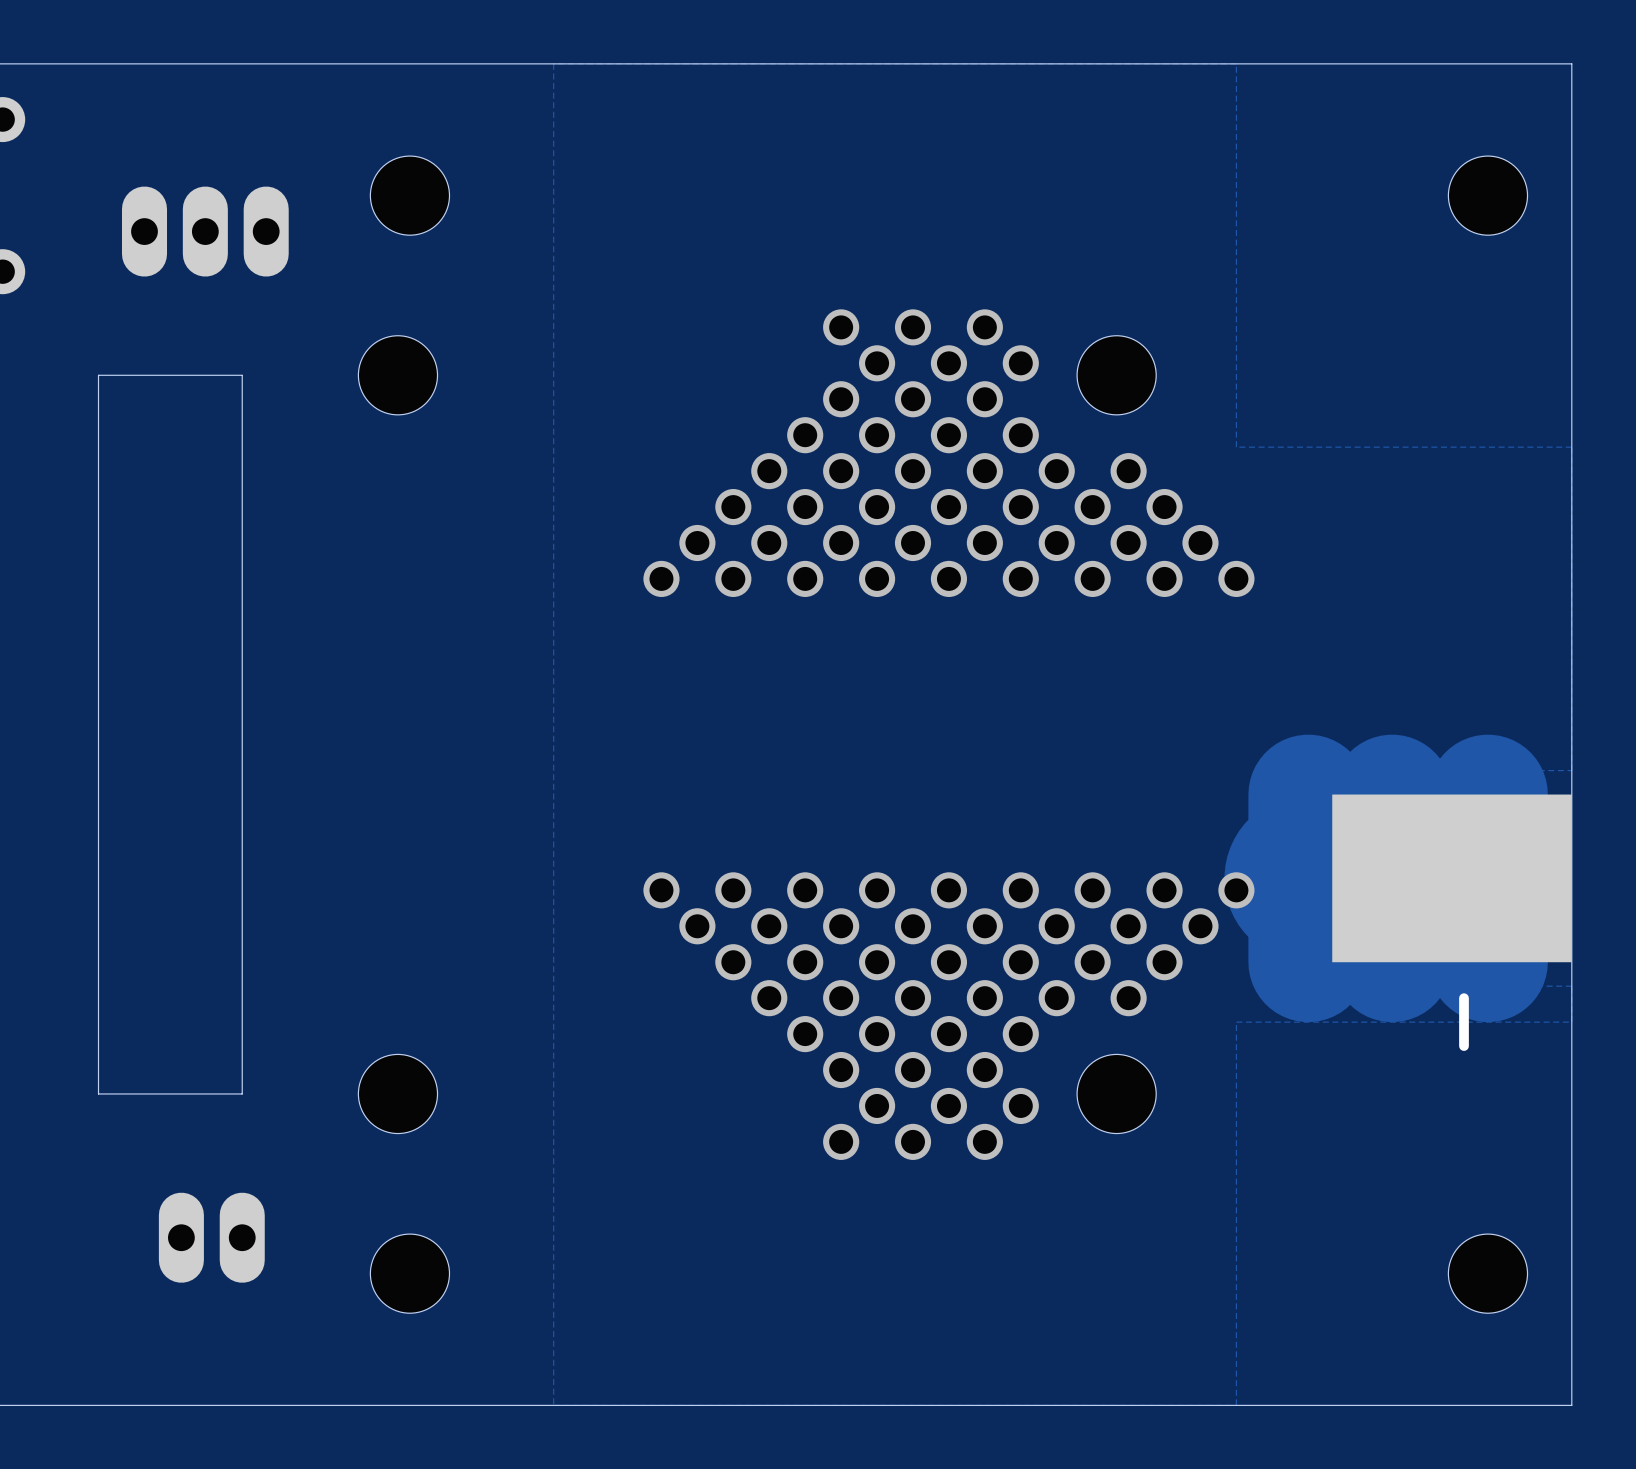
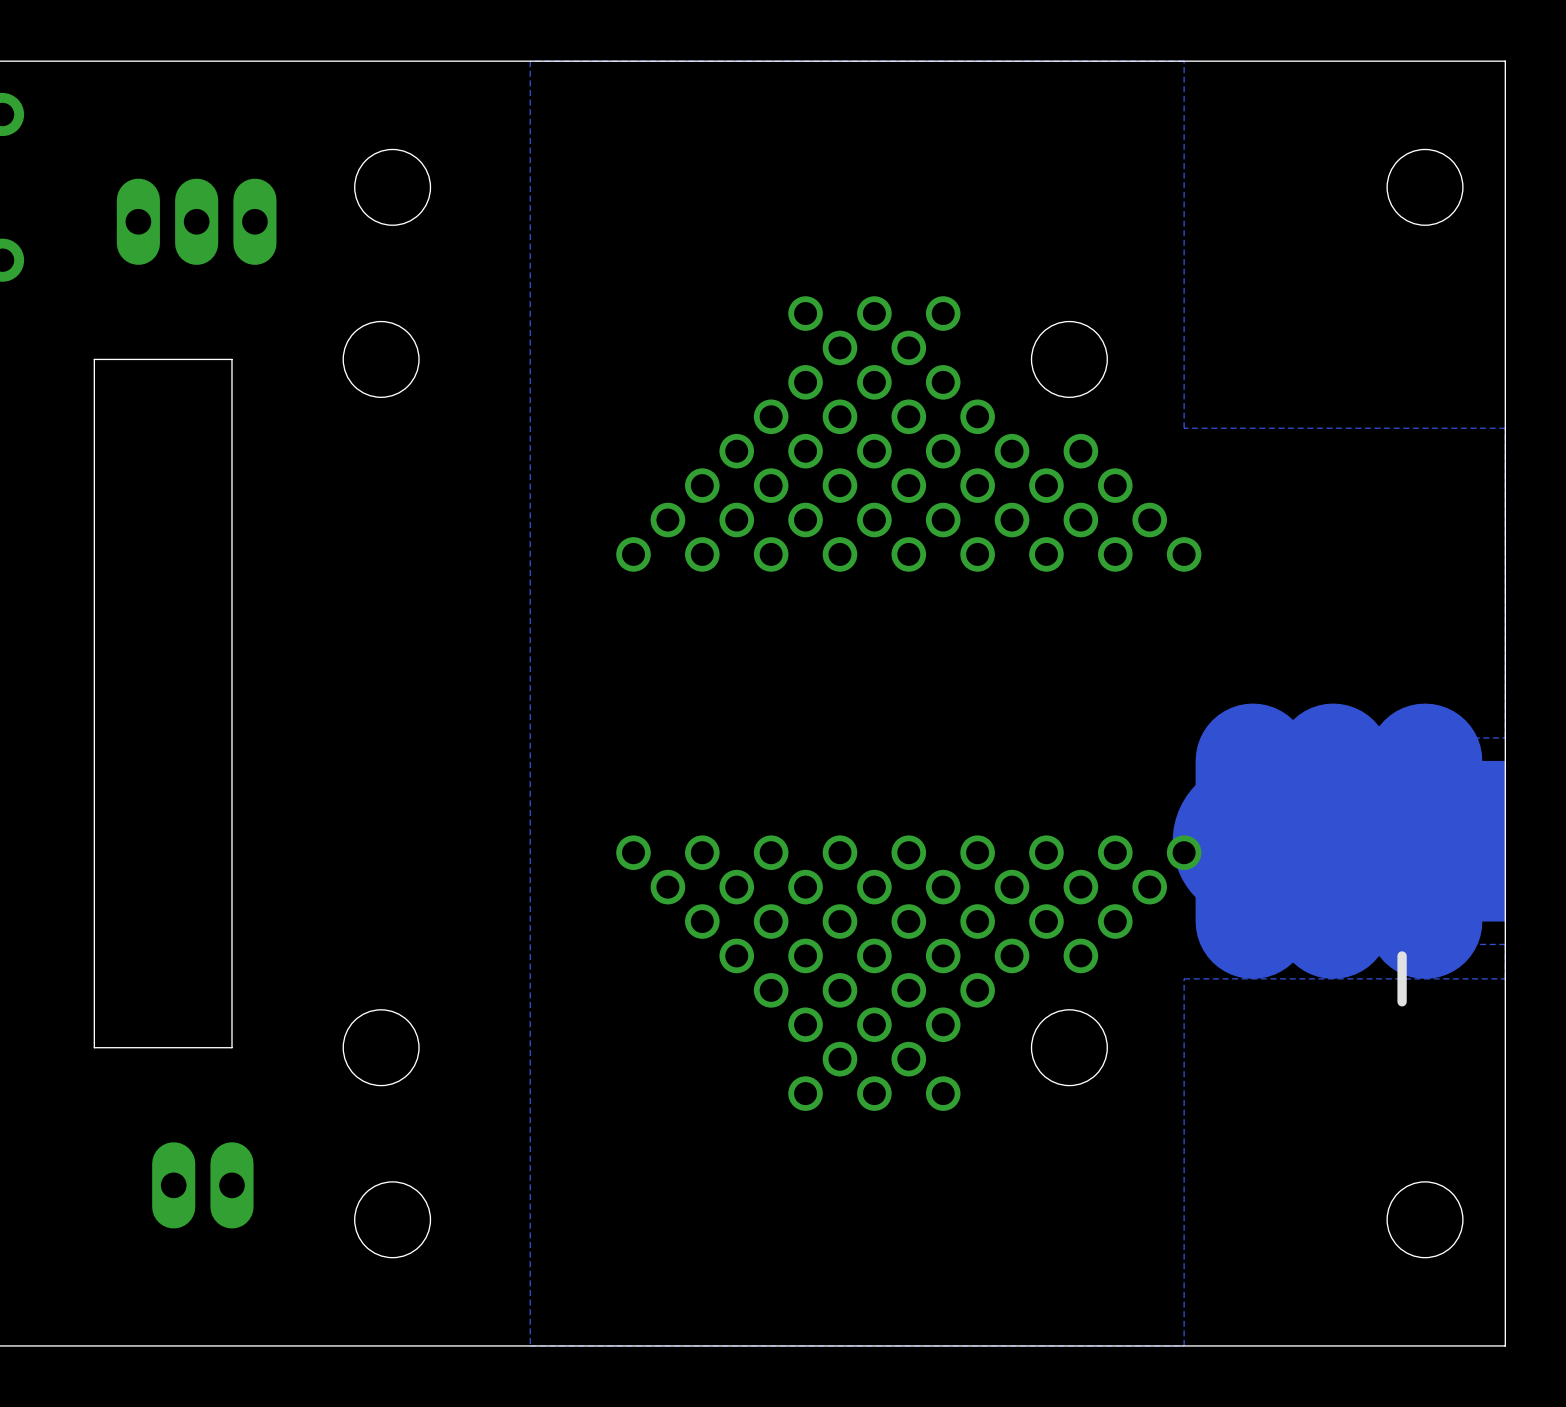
via: (1020, 363) -> none
via: (1020, 1105) -> none

